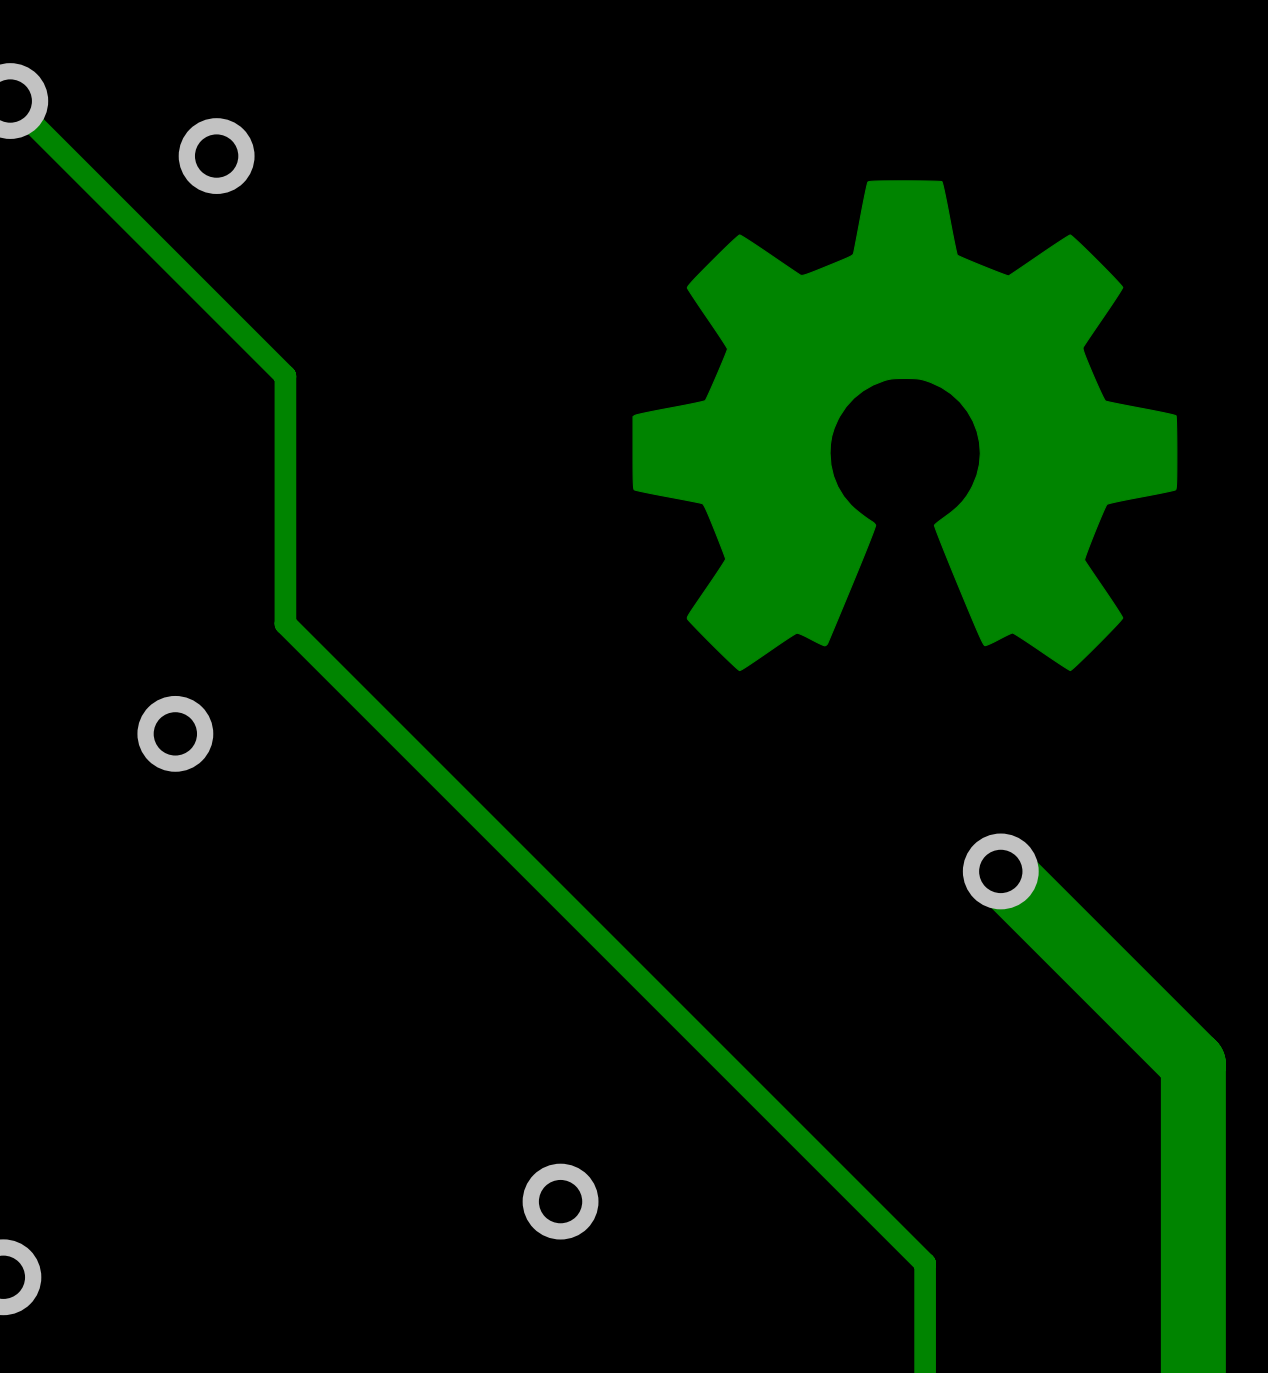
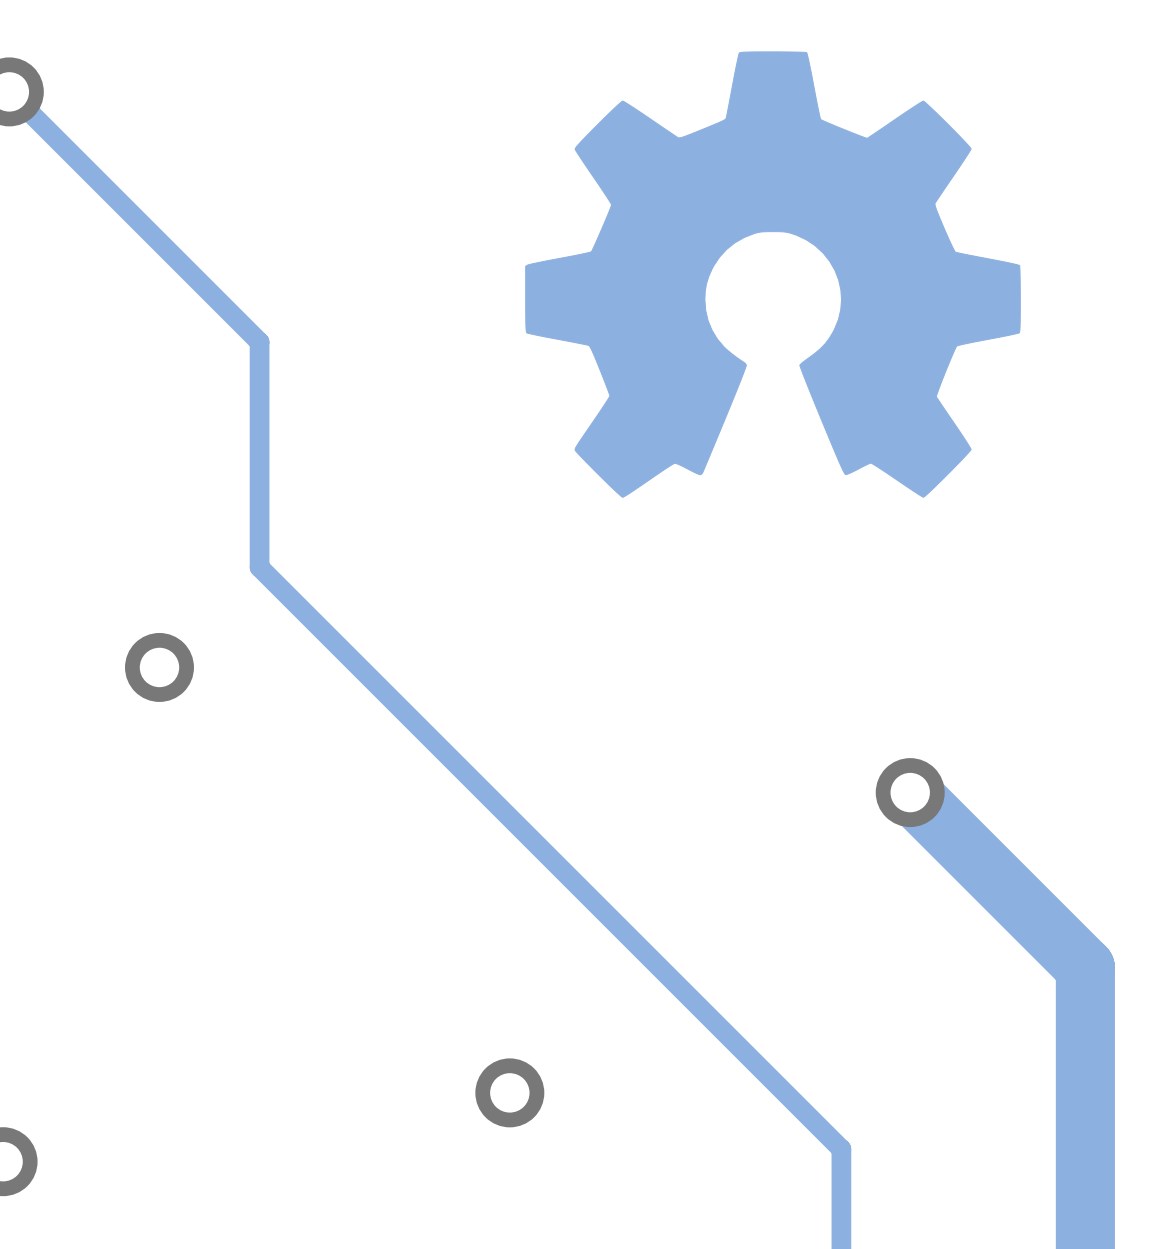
via: (216, 156) -> none
drawing position: (904, 425) -> (773, 274)

